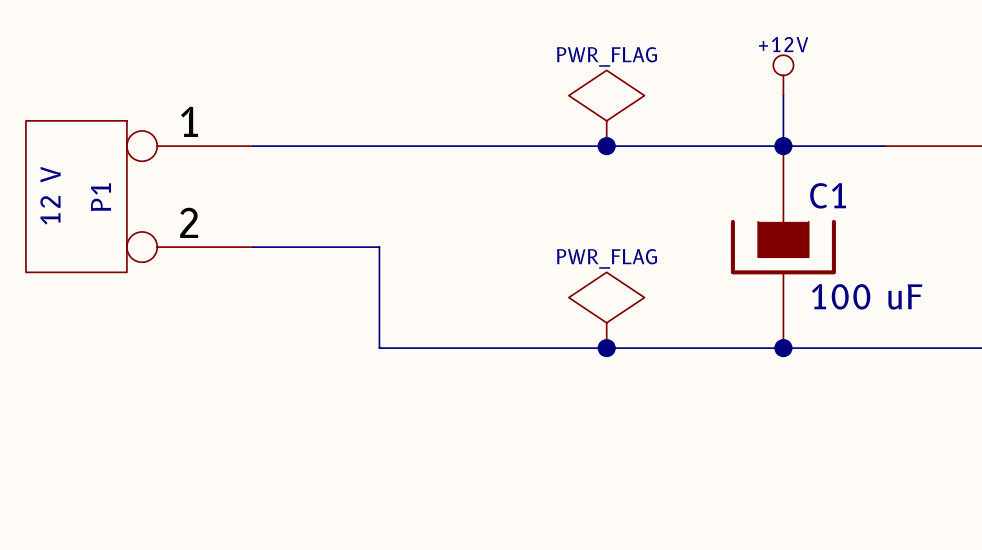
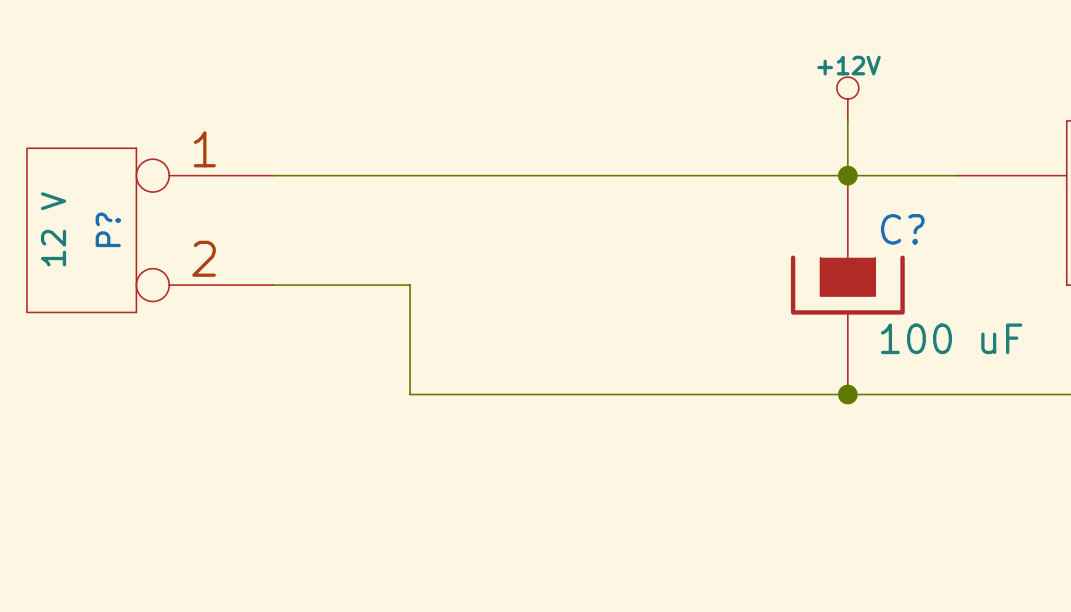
power symbol: PWR_FLAG (606, 108) -> none
junction: (606, 146) -> none
C1 name: C1 (828, 195) -> C? (902, 229)
P1 name: P1 (100, 197) -> P? (108, 229)
power symbol: PWR_FLAG (606, 310) -> none
junction: (606, 348) -> none

